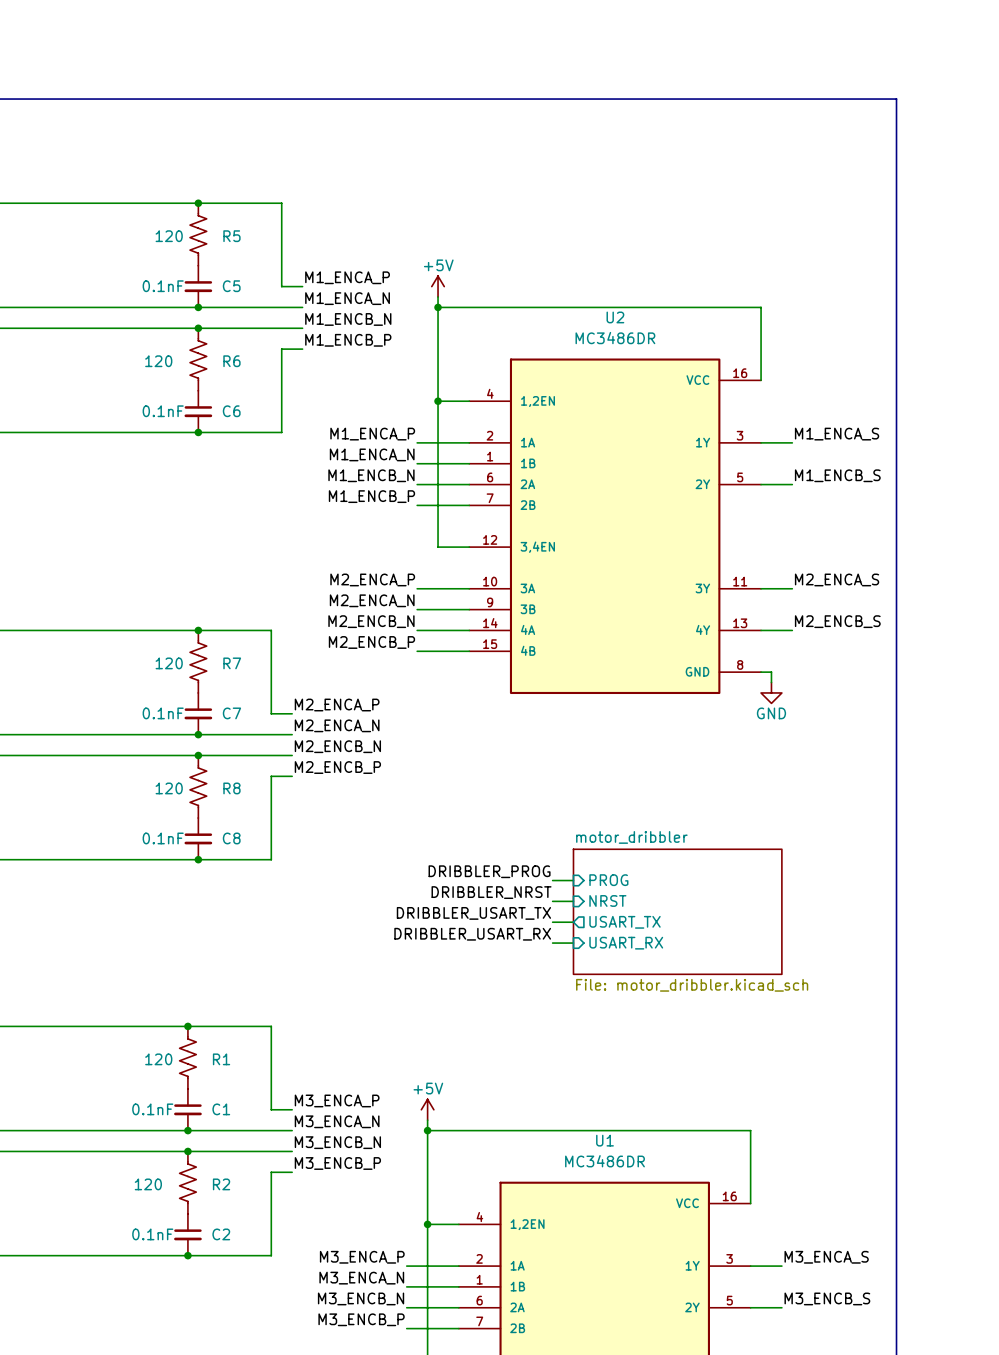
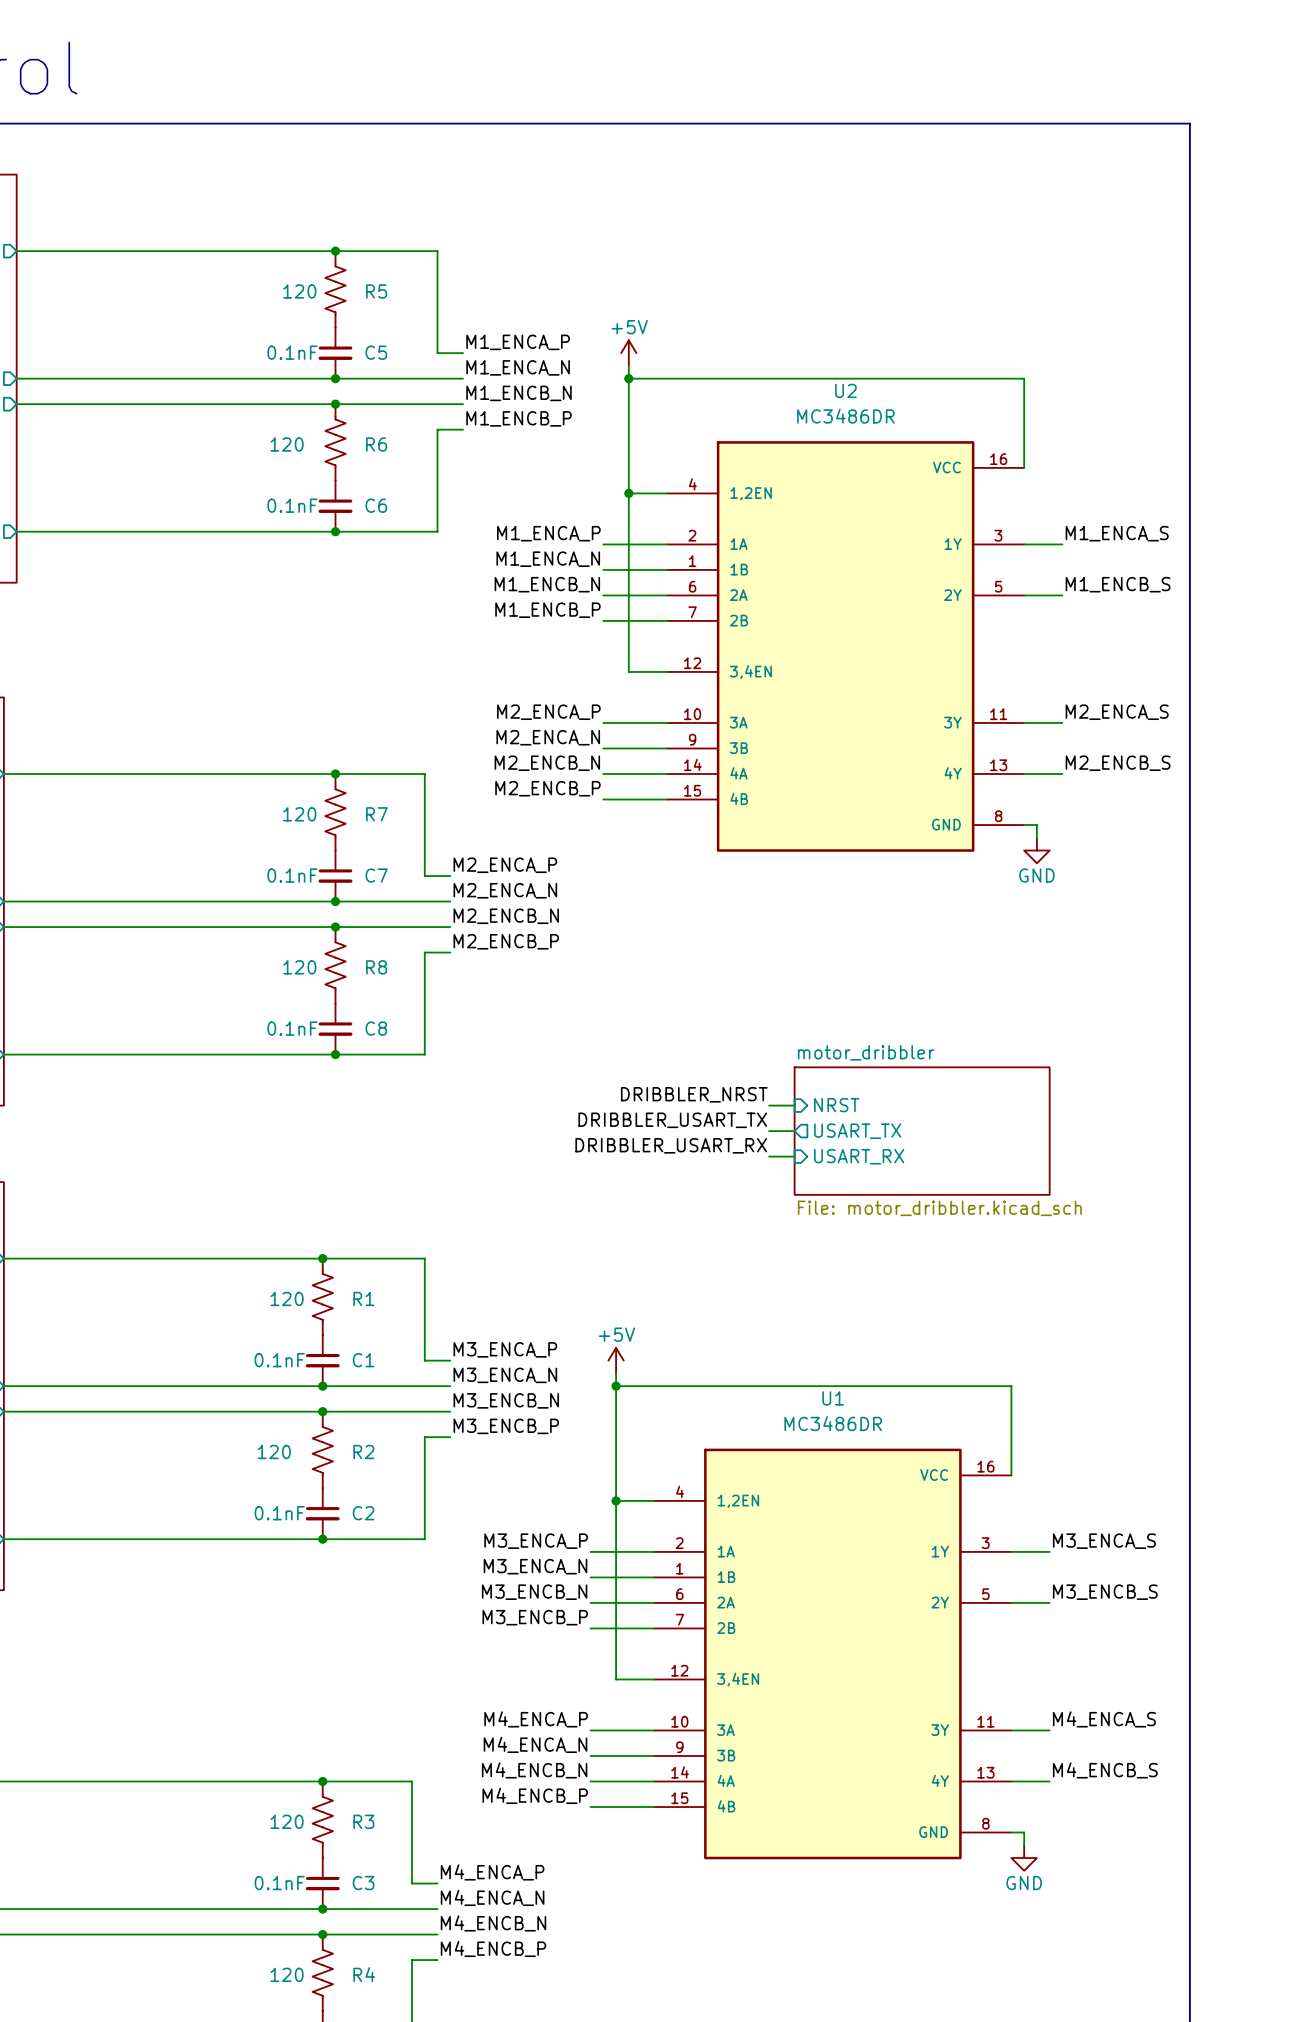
label: DRIBBLER_PROG (489, 871) -> none
wire: (552, 880) (573, 880) -> none
sheet pin: PROG (608, 880) -> none
sheet motor_dribbler: File: motor_dribbler.kicad_sch (677, 911) -> none
sheet motor_dribbler: none -> File: motor_dribbler.kicad_sch (922, 1131)

